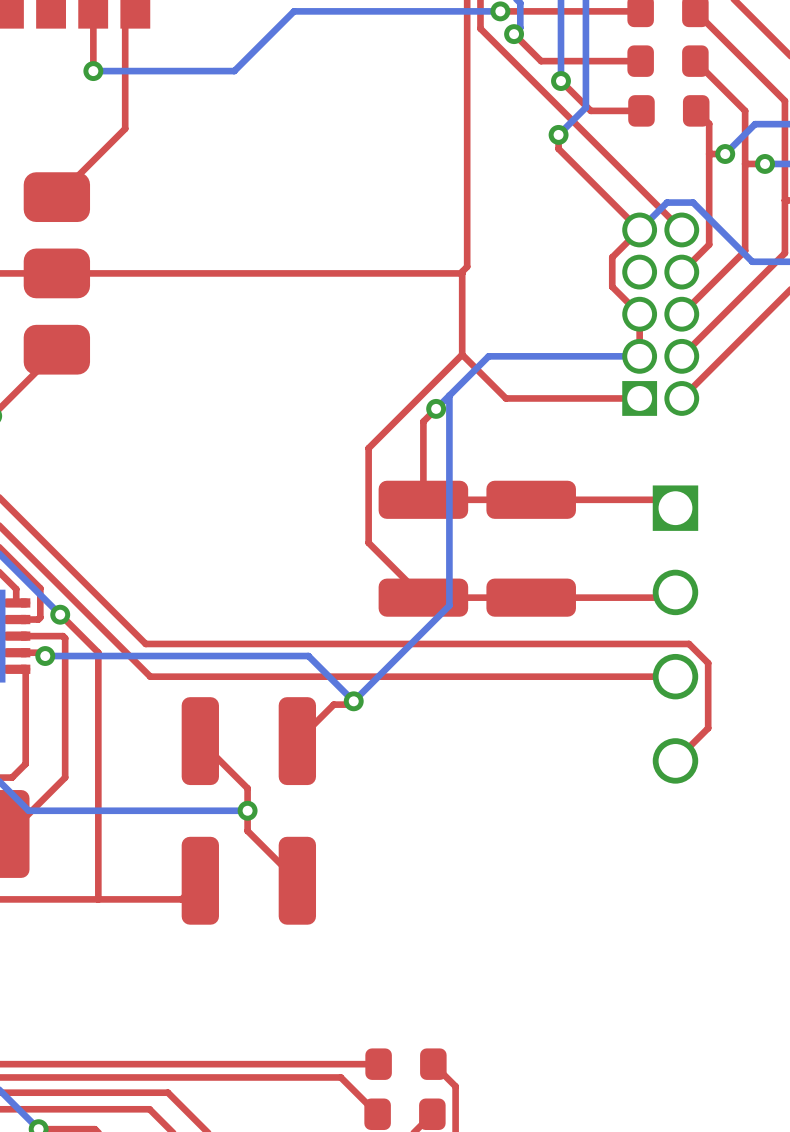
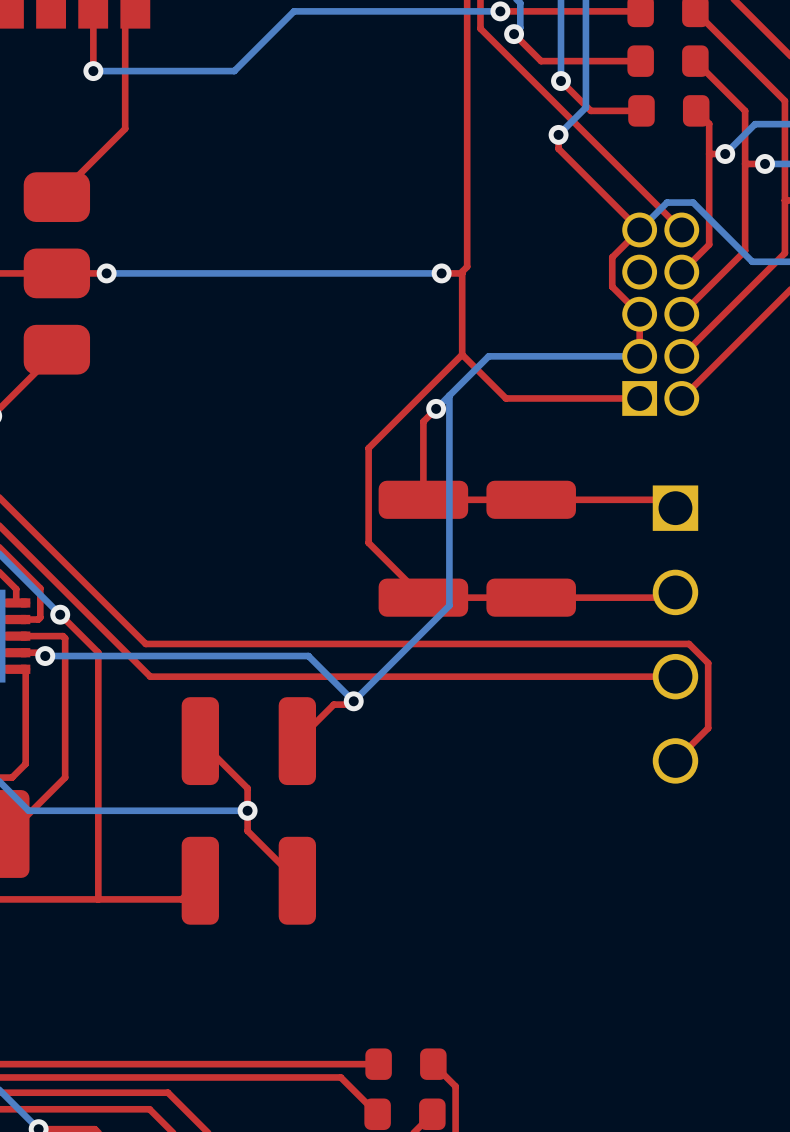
via: none -> (106, 273)
top track: (441, 273) (106, 273) -> none
bottom track: none -> (441, 273) (106, 273)
via: none -> (441, 273)

